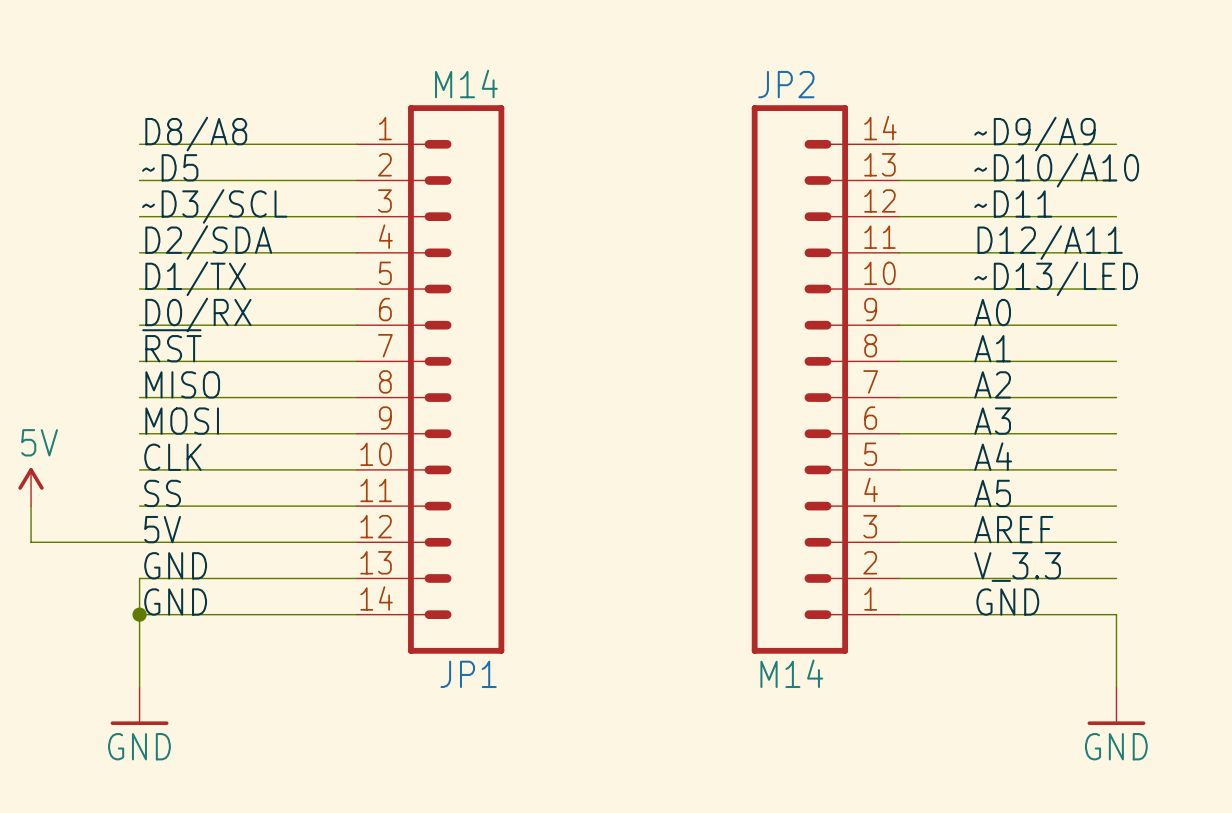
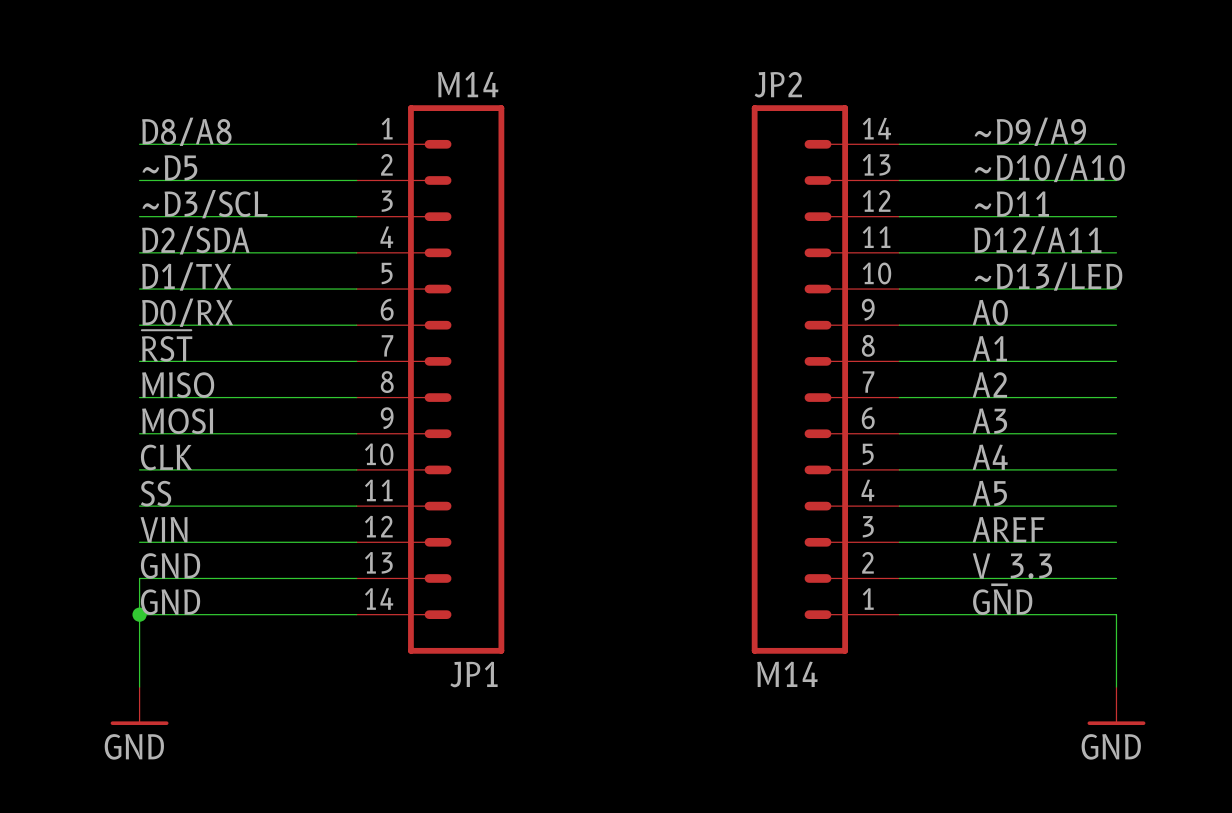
power symbol: 5V (31, 487) -> none
wire: (31, 506) (31, 542) (139, 542) -> none
label: 5V (162, 529) -> VIN (164, 529)

